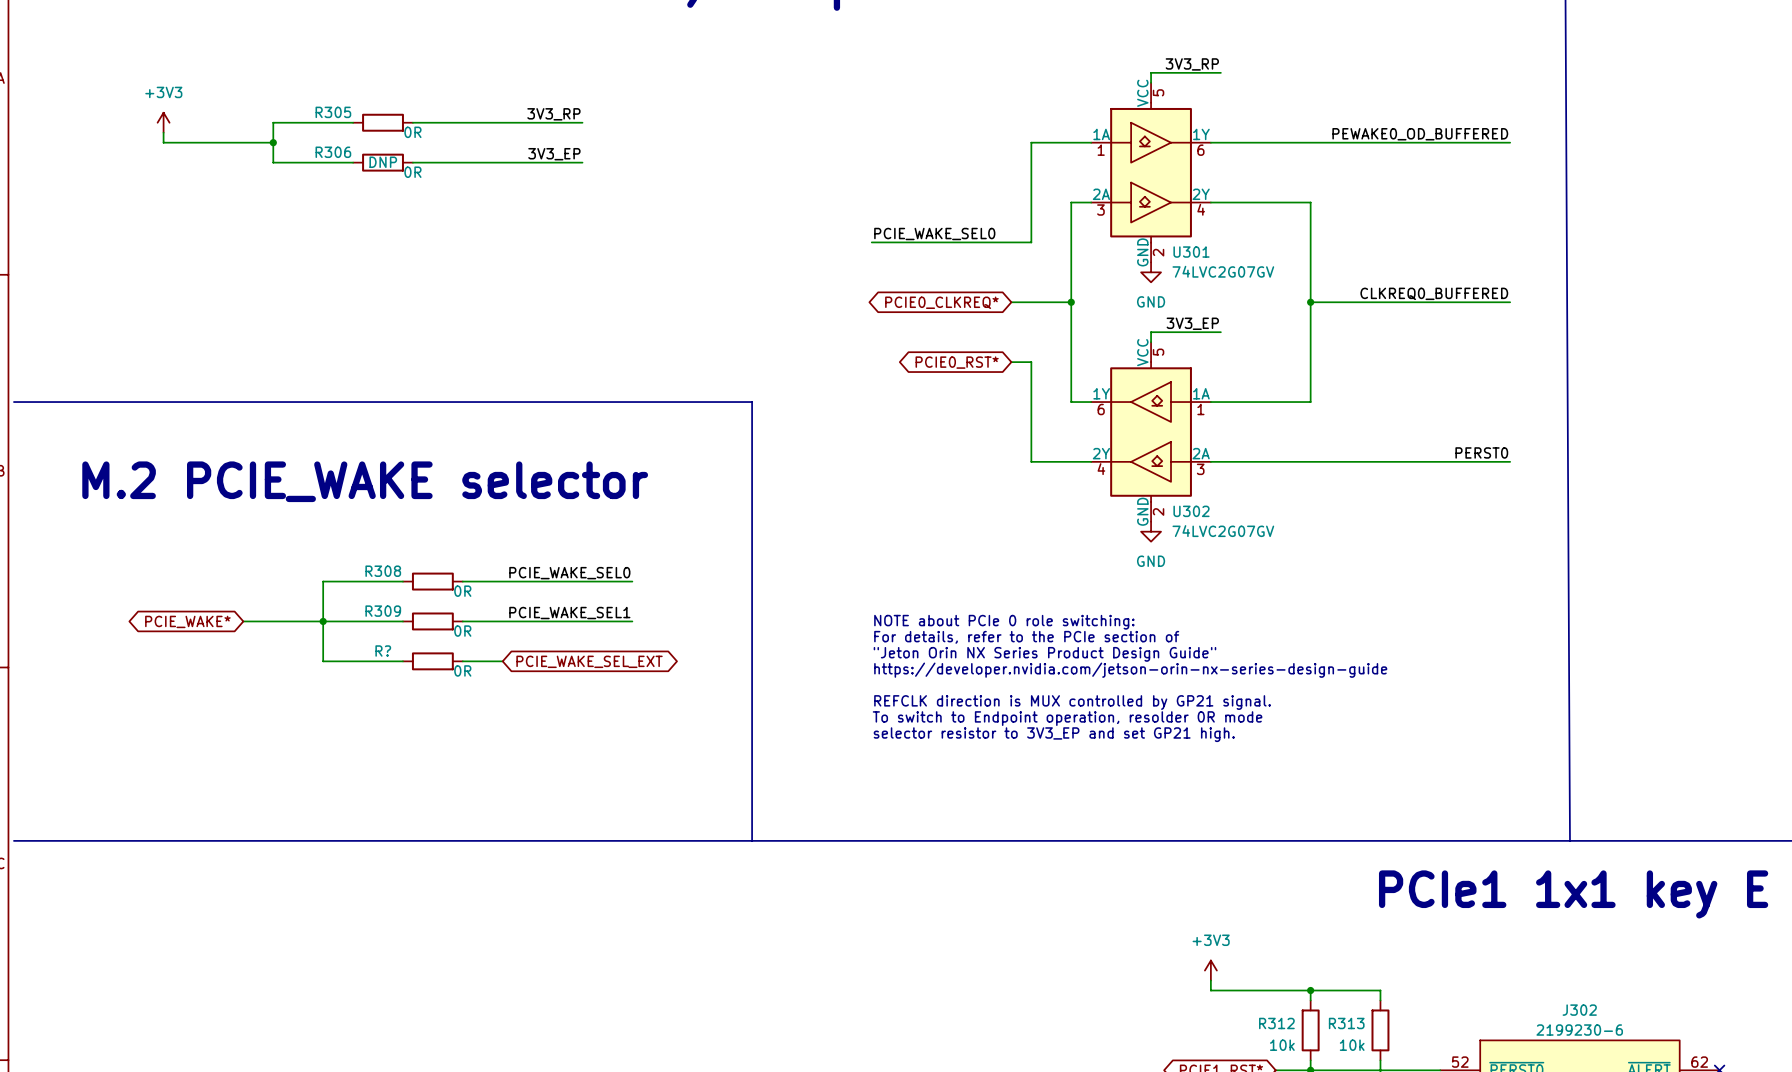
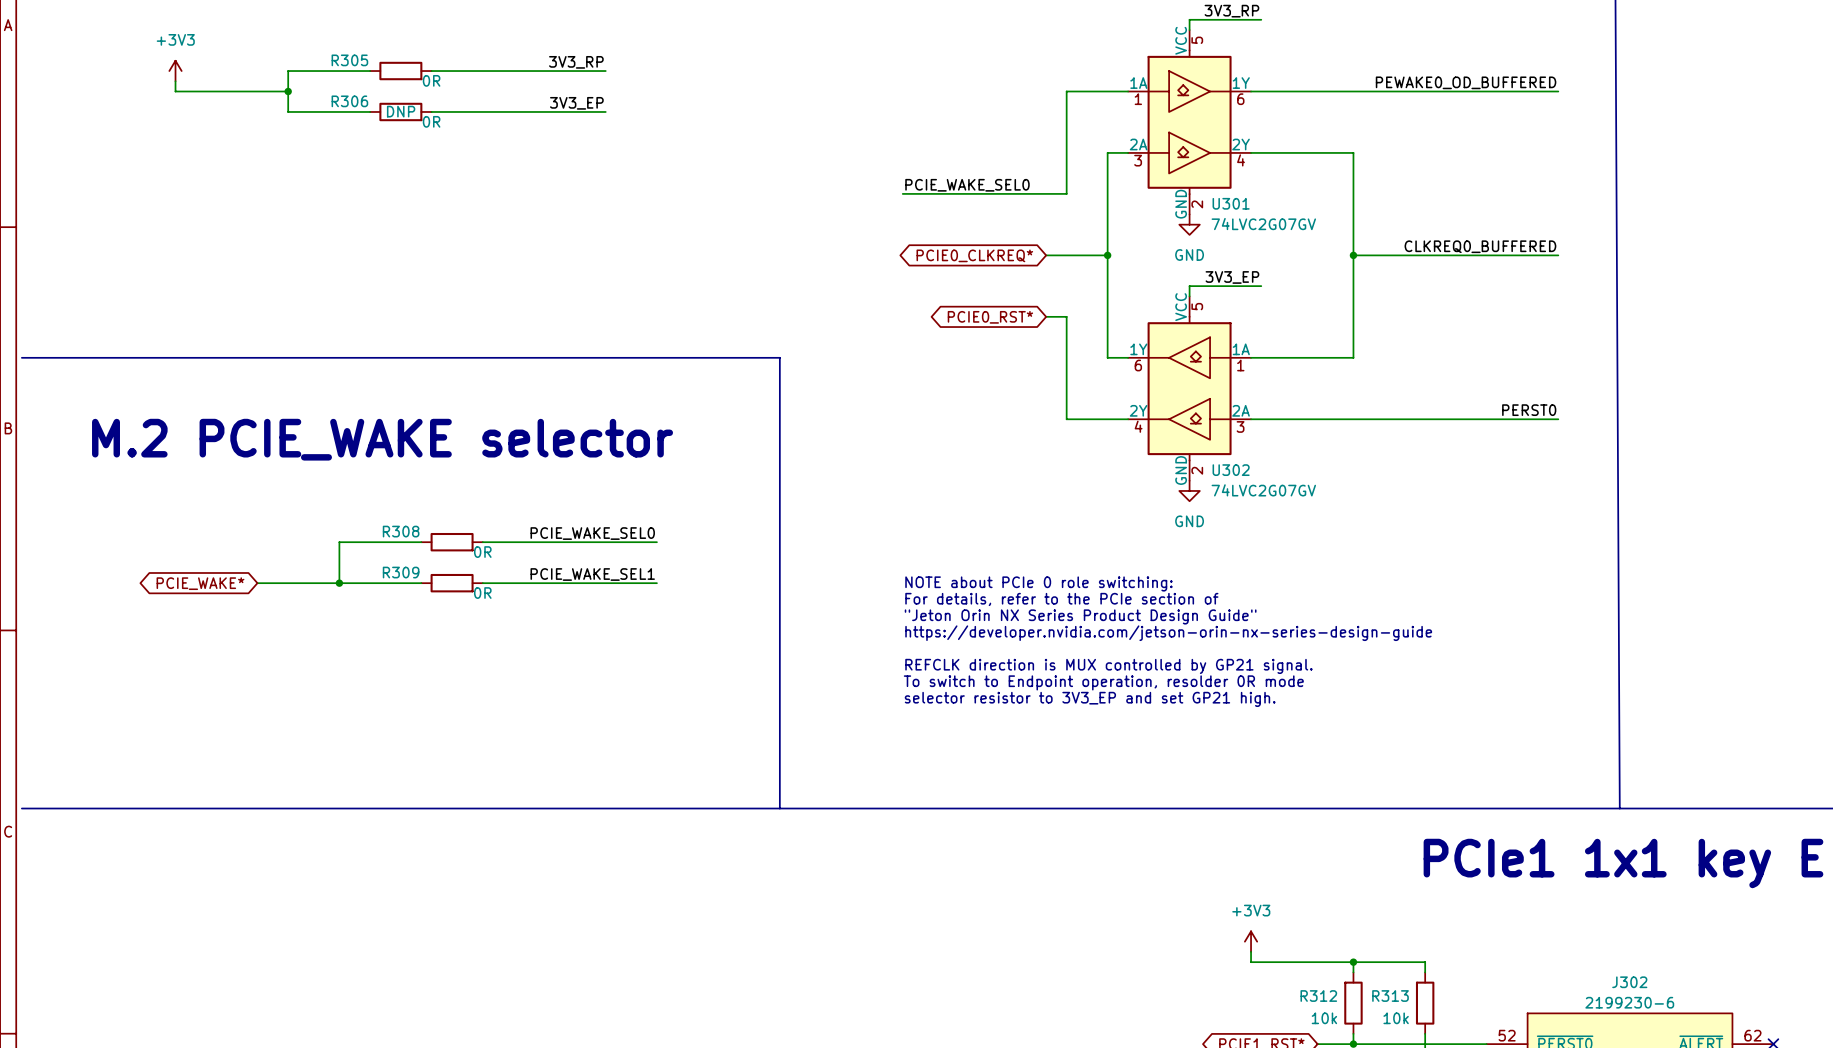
wire: (323, 621) (323, 661) (402, 661) -> none
R?: (432, 661) -> none
wire: (462, 661) (502, 661) -> none
global label: PCIE_WAKE_SEL_EXT (589, 661) -> none

